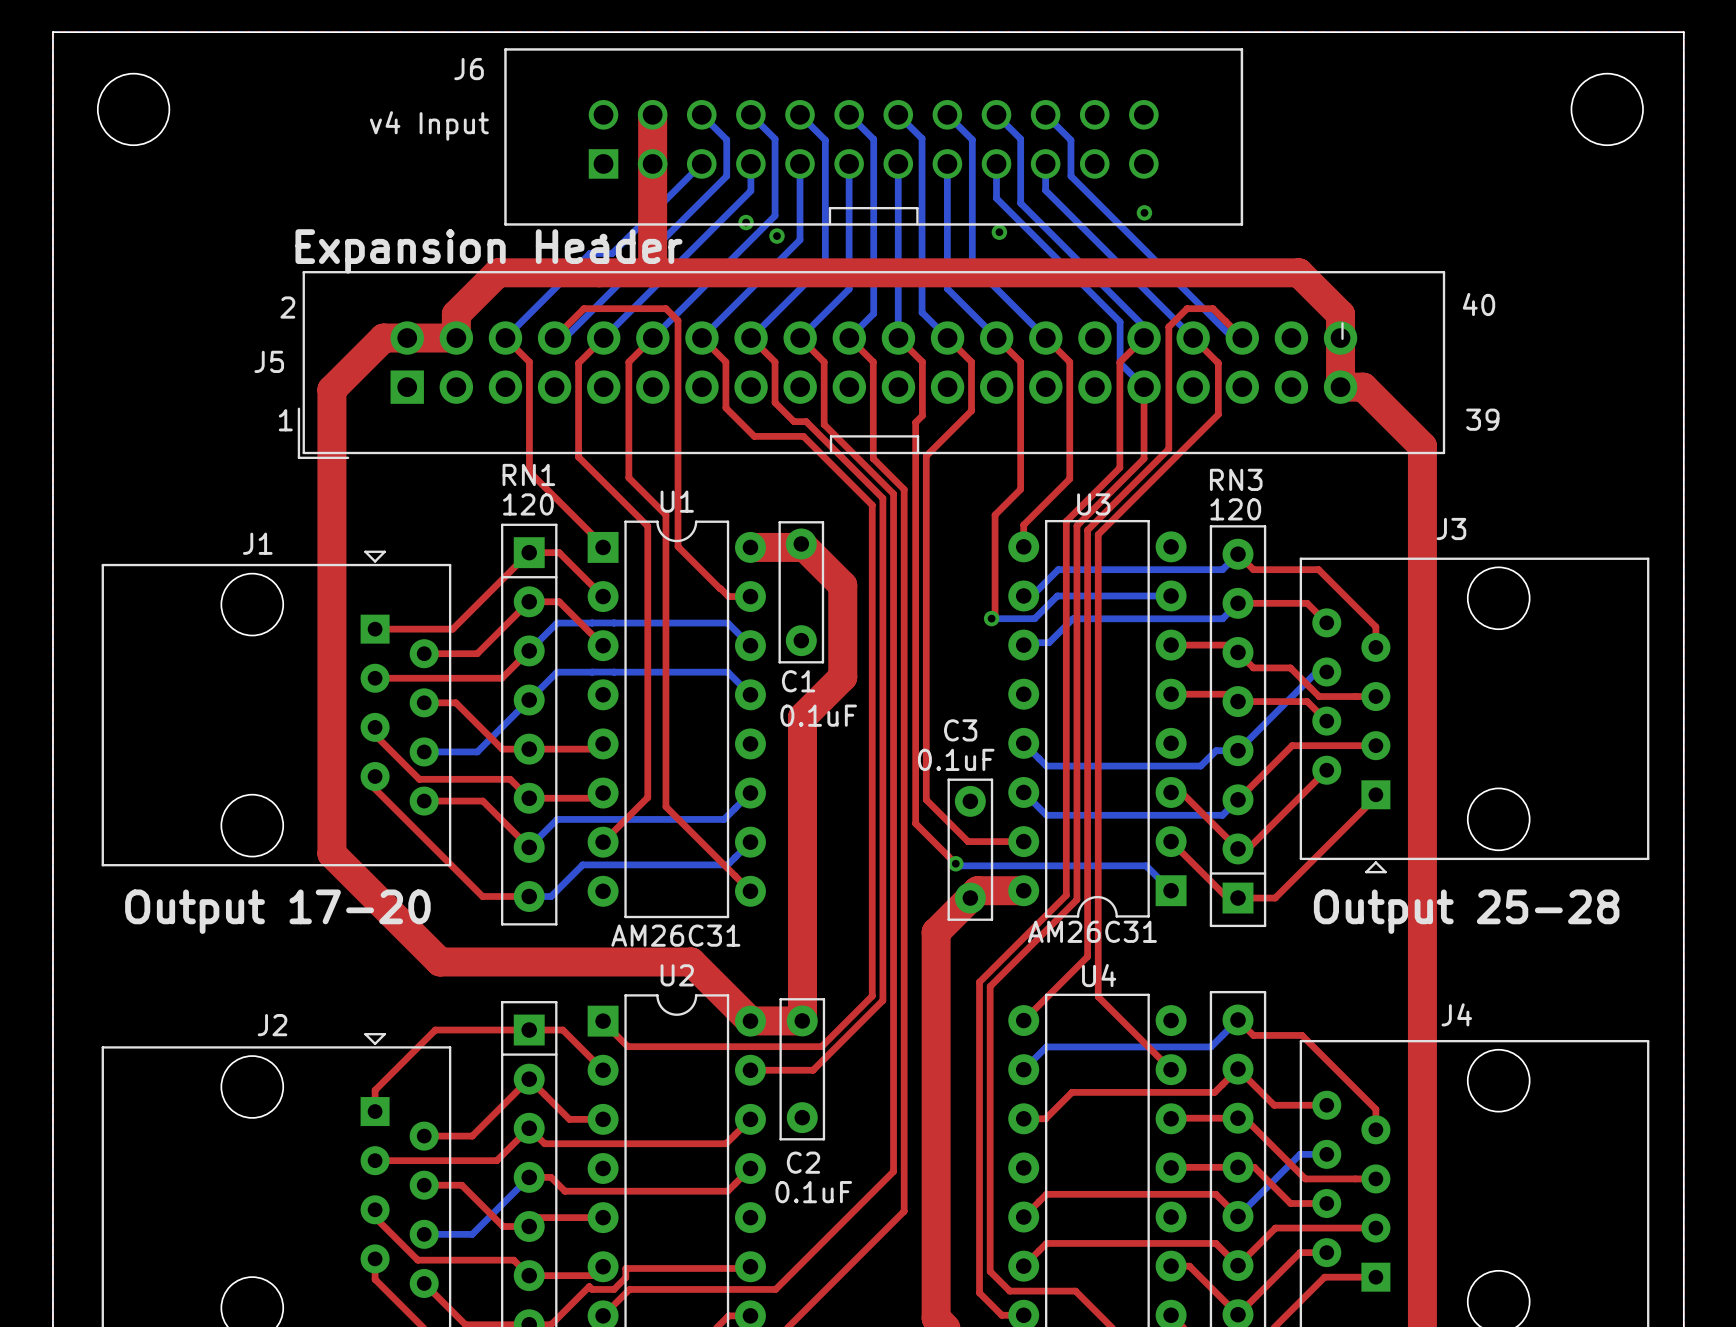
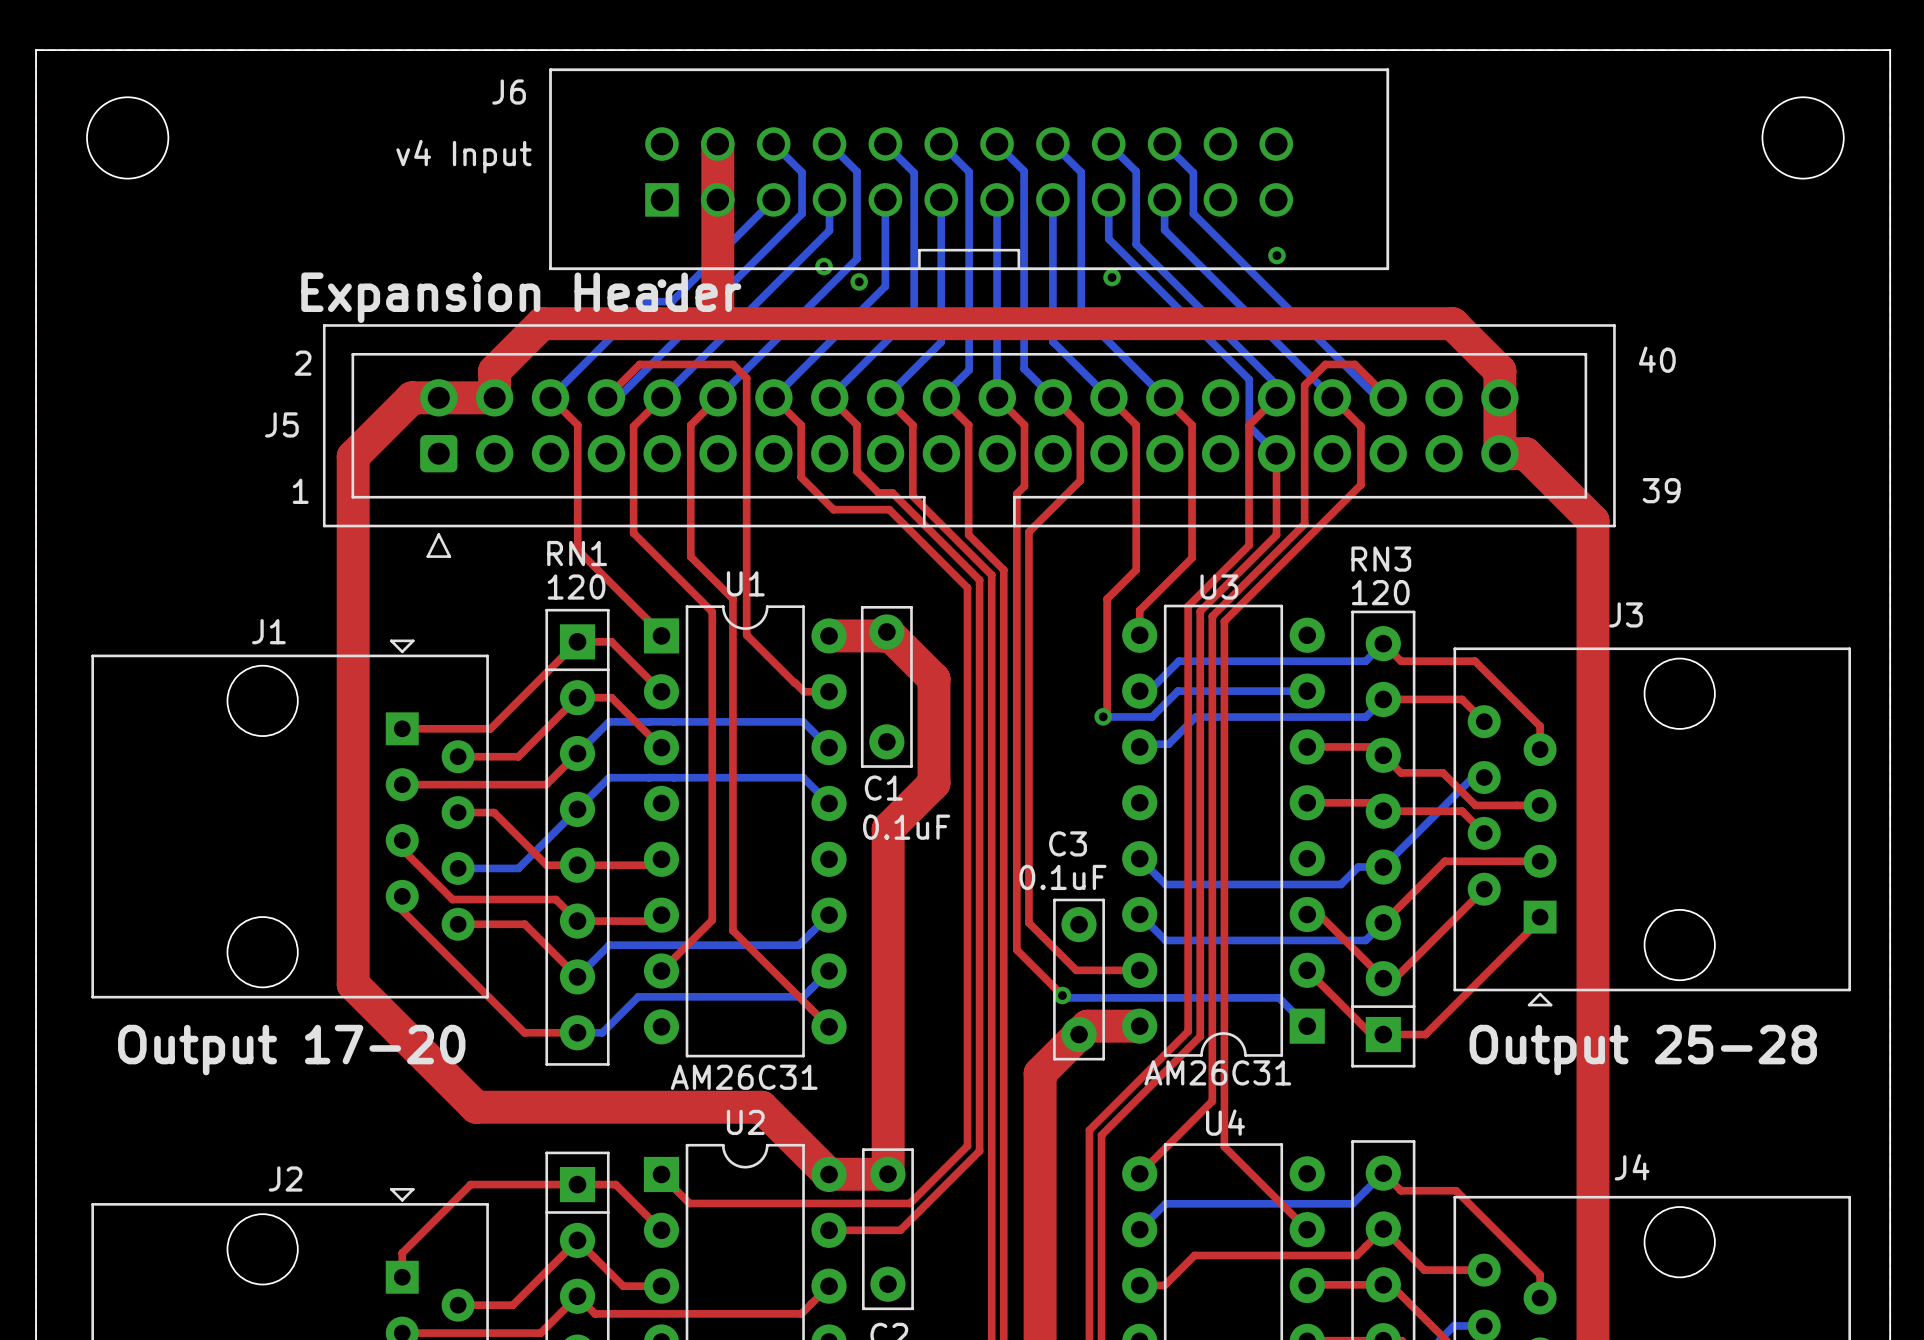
J5 footprint: [297, 271, 1446, 459] -> [322, 324, 1616, 558]
line: (1342, 323) (1342, 338) -> none
line: (831, 451) (831, 436) (918, 436) (918, 451) -> none

